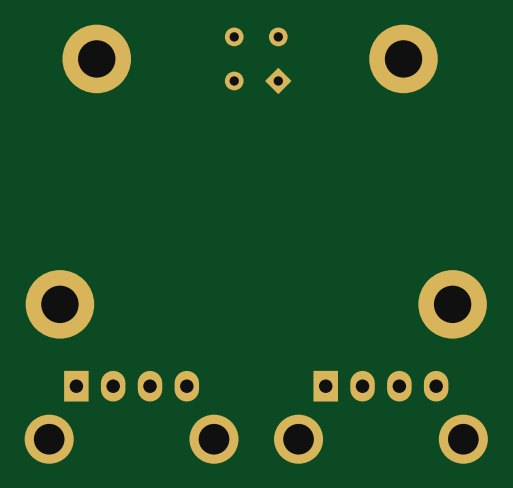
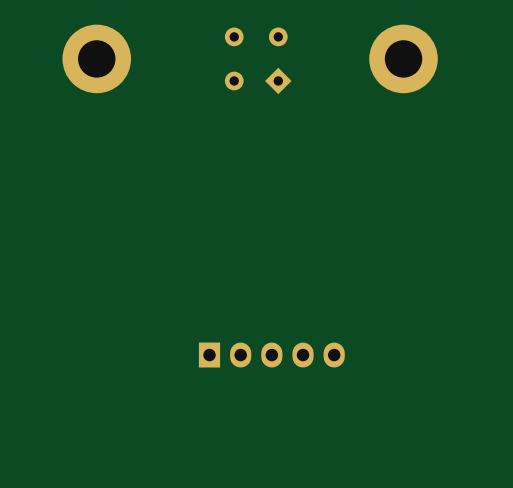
part: (59, 304) -> none
part: (452, 304) -> none
part: none -> (271, 355)
part: (131, 417) -> none
part: (380, 417) -> none

